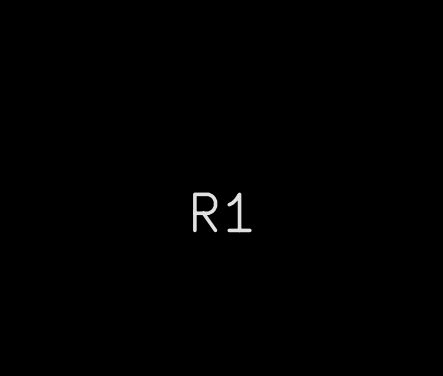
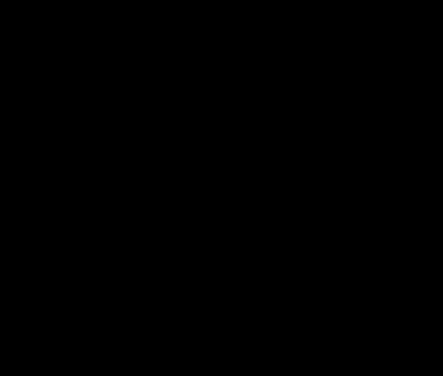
text: R1 (222, 212) -> none

